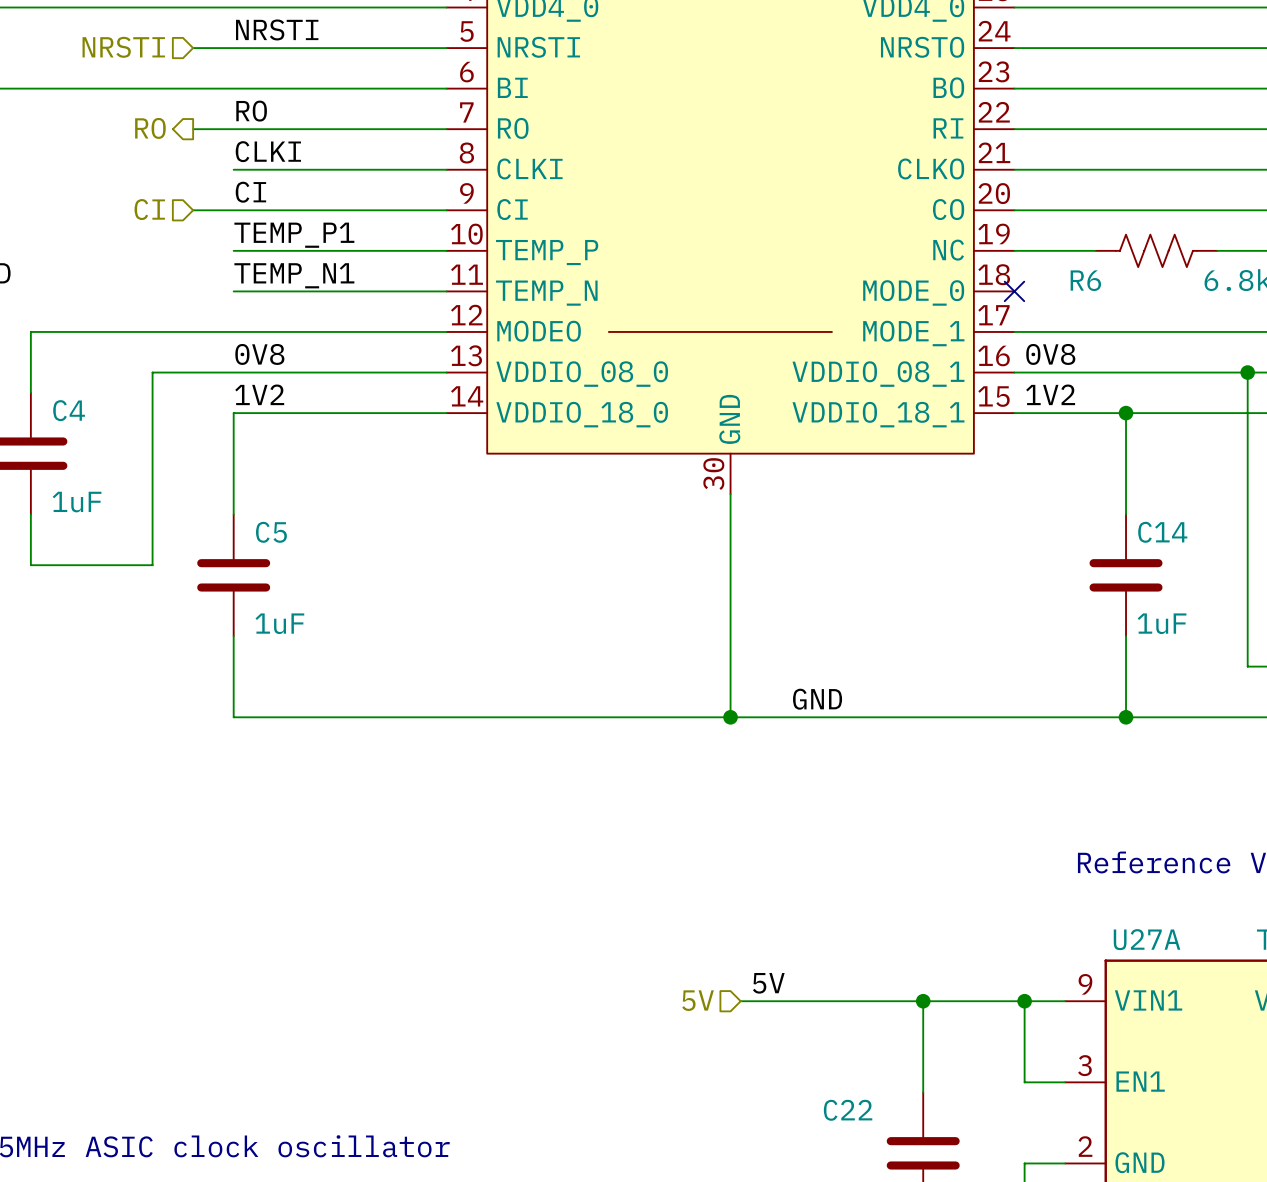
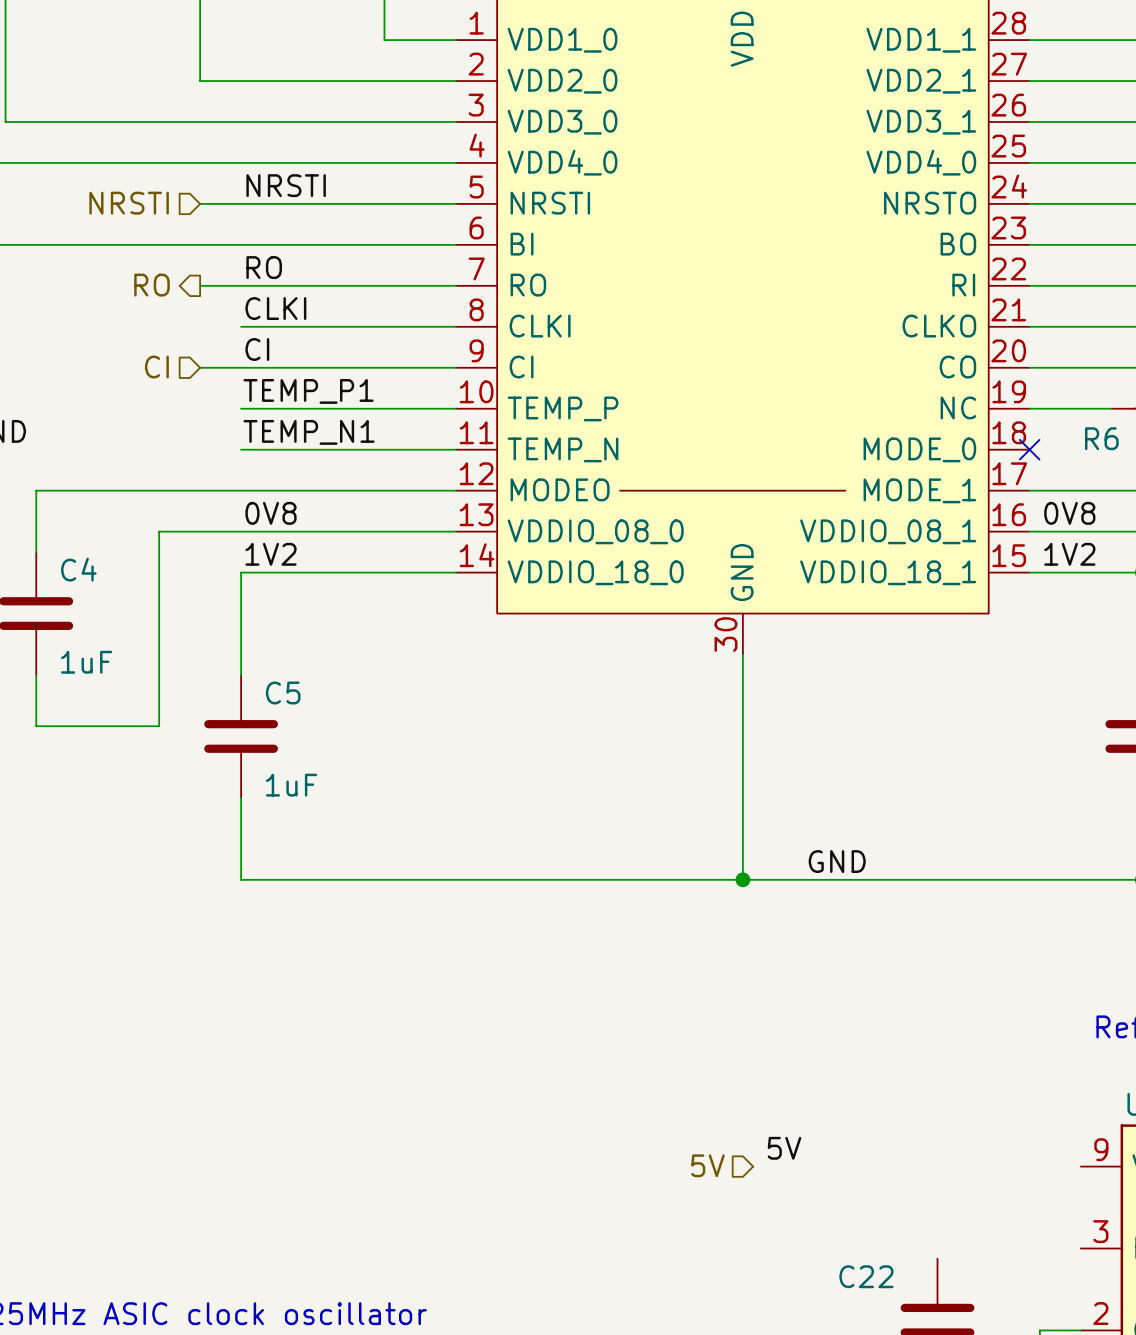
wire: (740, 1001) (1065, 1001) -> none
wire: (923, 1001) (923, 1092) -> none
junction: (923, 1001) -> none
wire: (1024, 1001) (1024, 1082) (1065, 1082) -> none
junction: (1024, 1001) -> none

